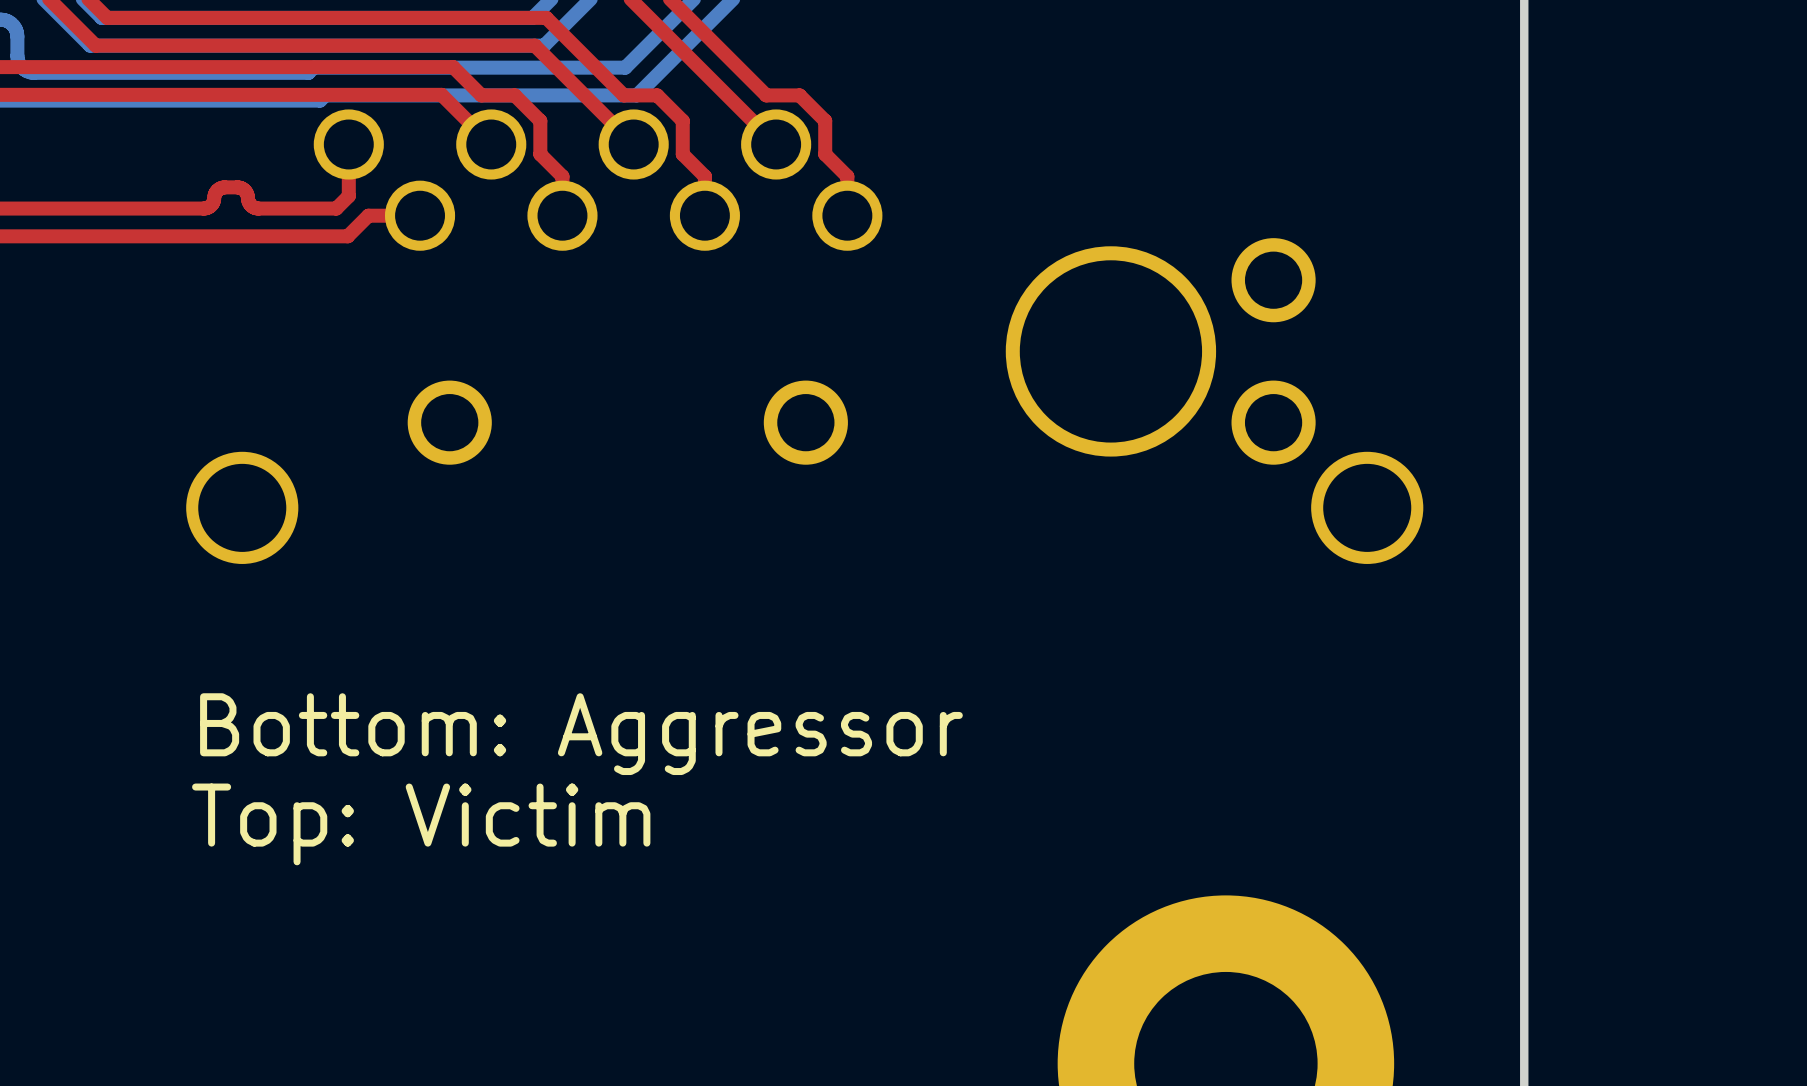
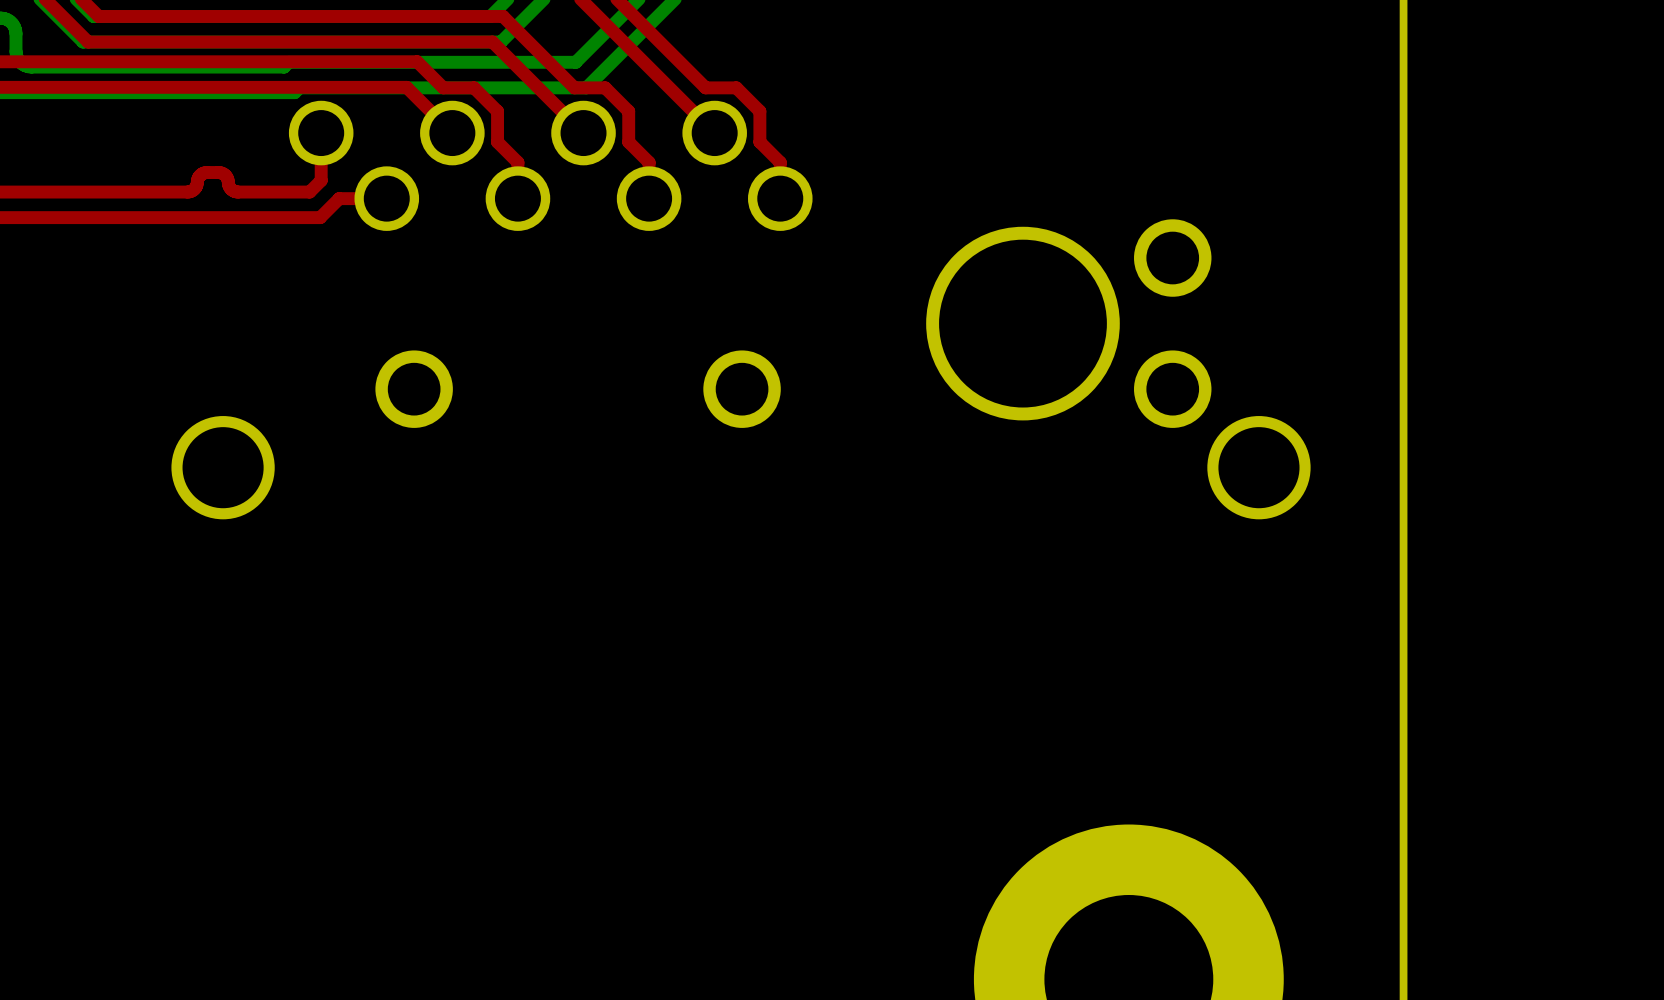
text: Bottom: Aggressor (581, 734) -> none
text: Top: Victim (421, 824) -> none

